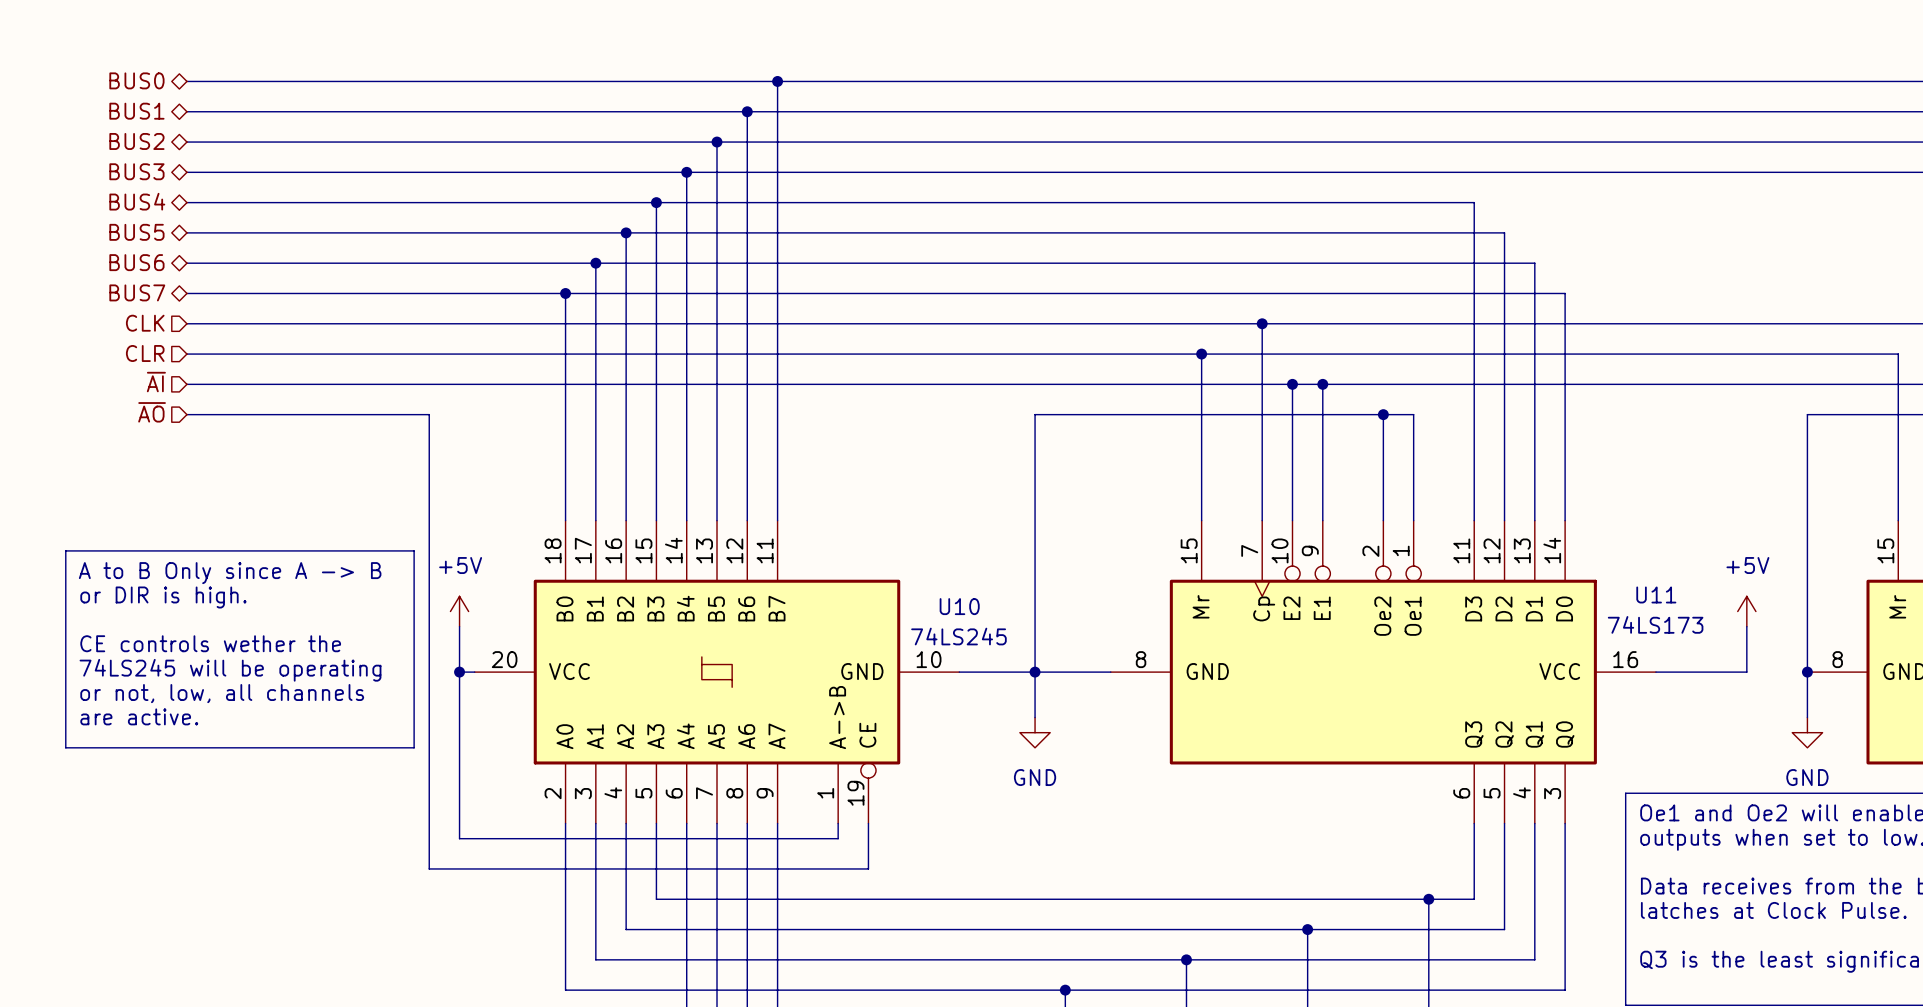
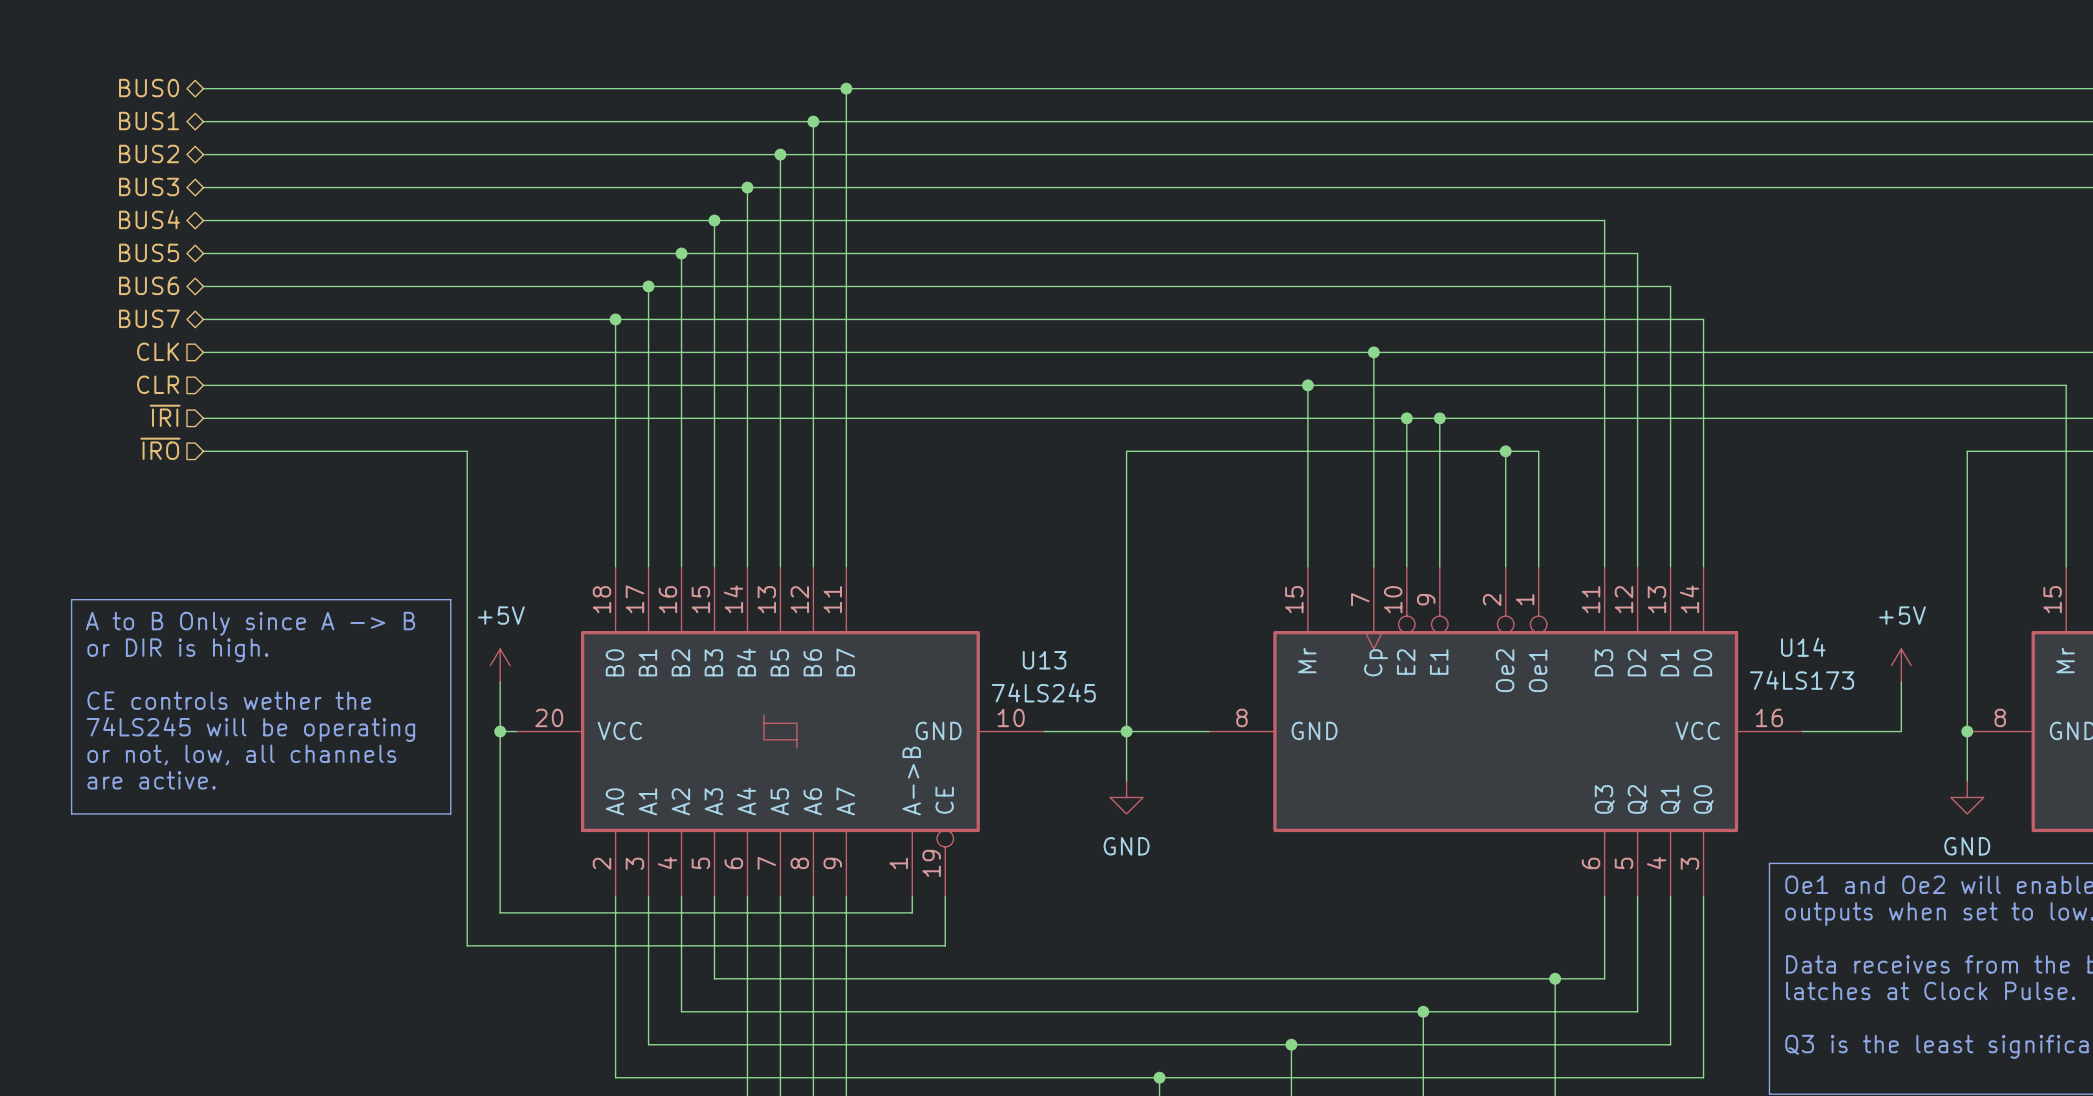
hierarchical label: ~{AI} (156, 382) -> ~{IRI} (165, 415)
hierarchical label: ~{AO} (152, 412) -> ~{IRO} (160, 448)
U11 name: U11 (1656, 594) -> U14 (1803, 647)
U10 name: U10 (959, 606) -> U13 (1044, 660)

